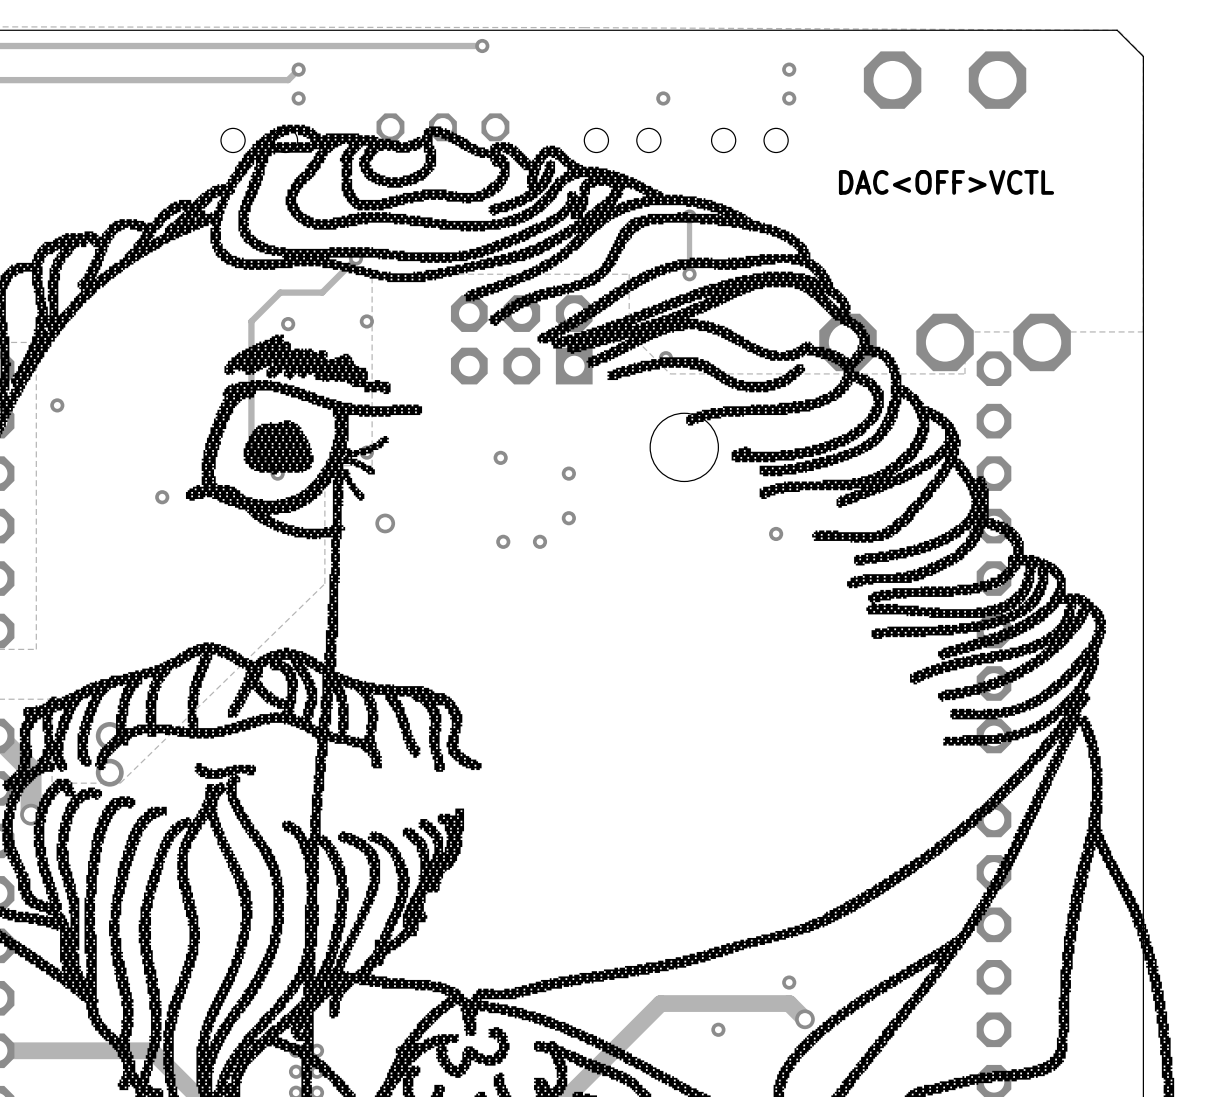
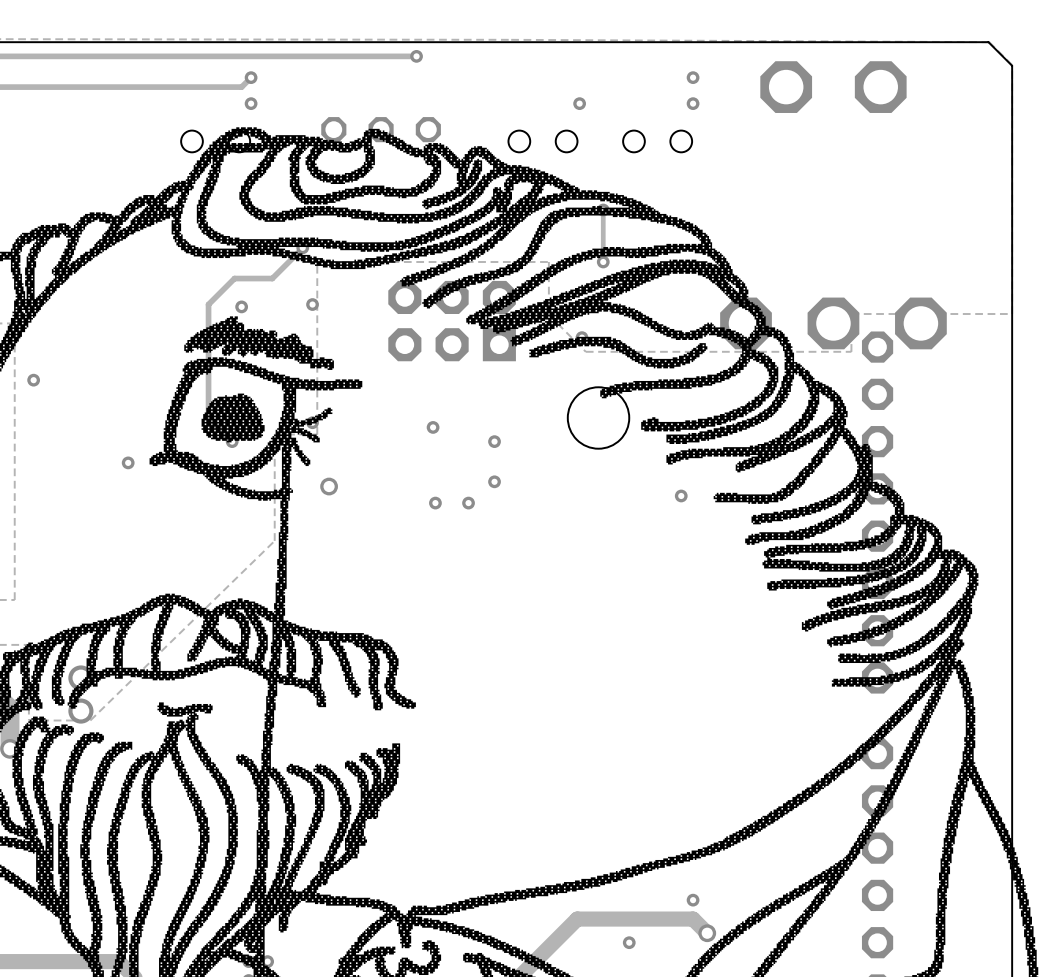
text: DAC<OFF>VCTL (946, 182) -> none

